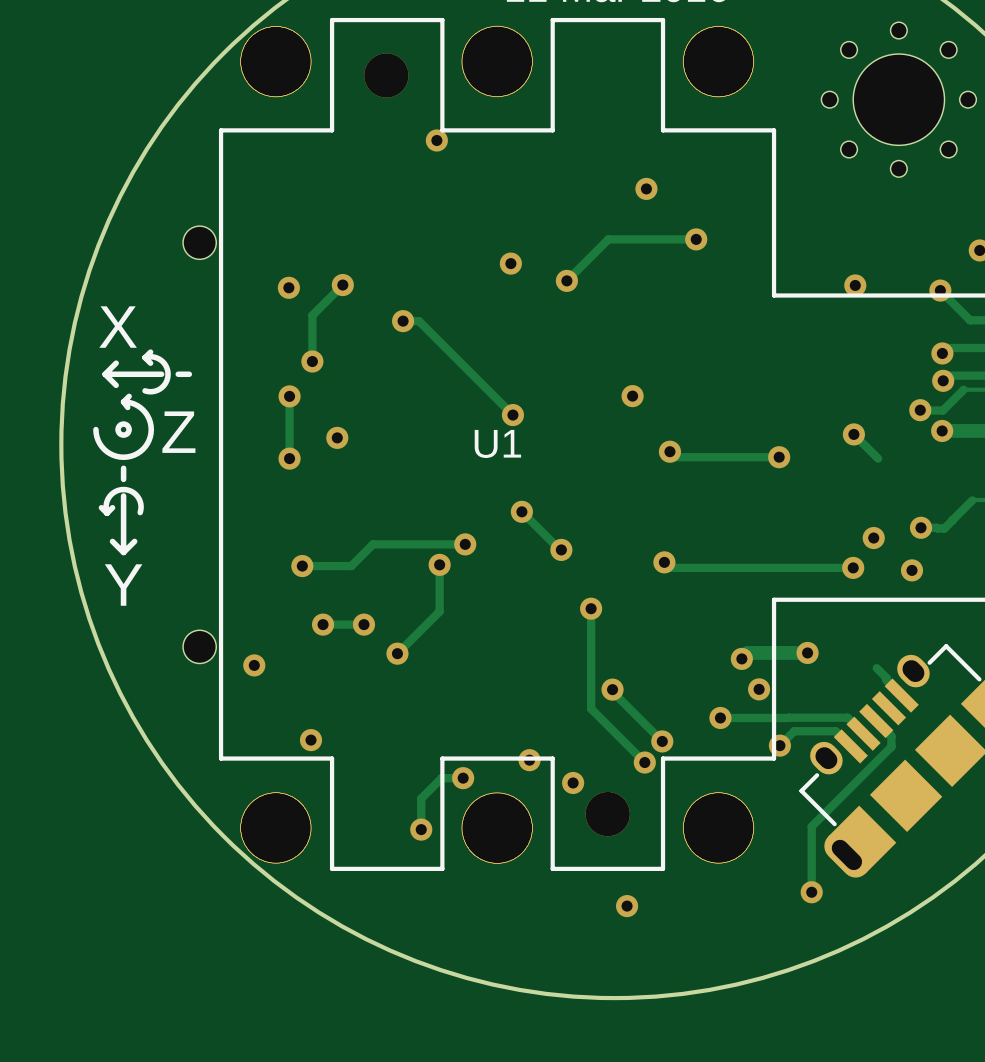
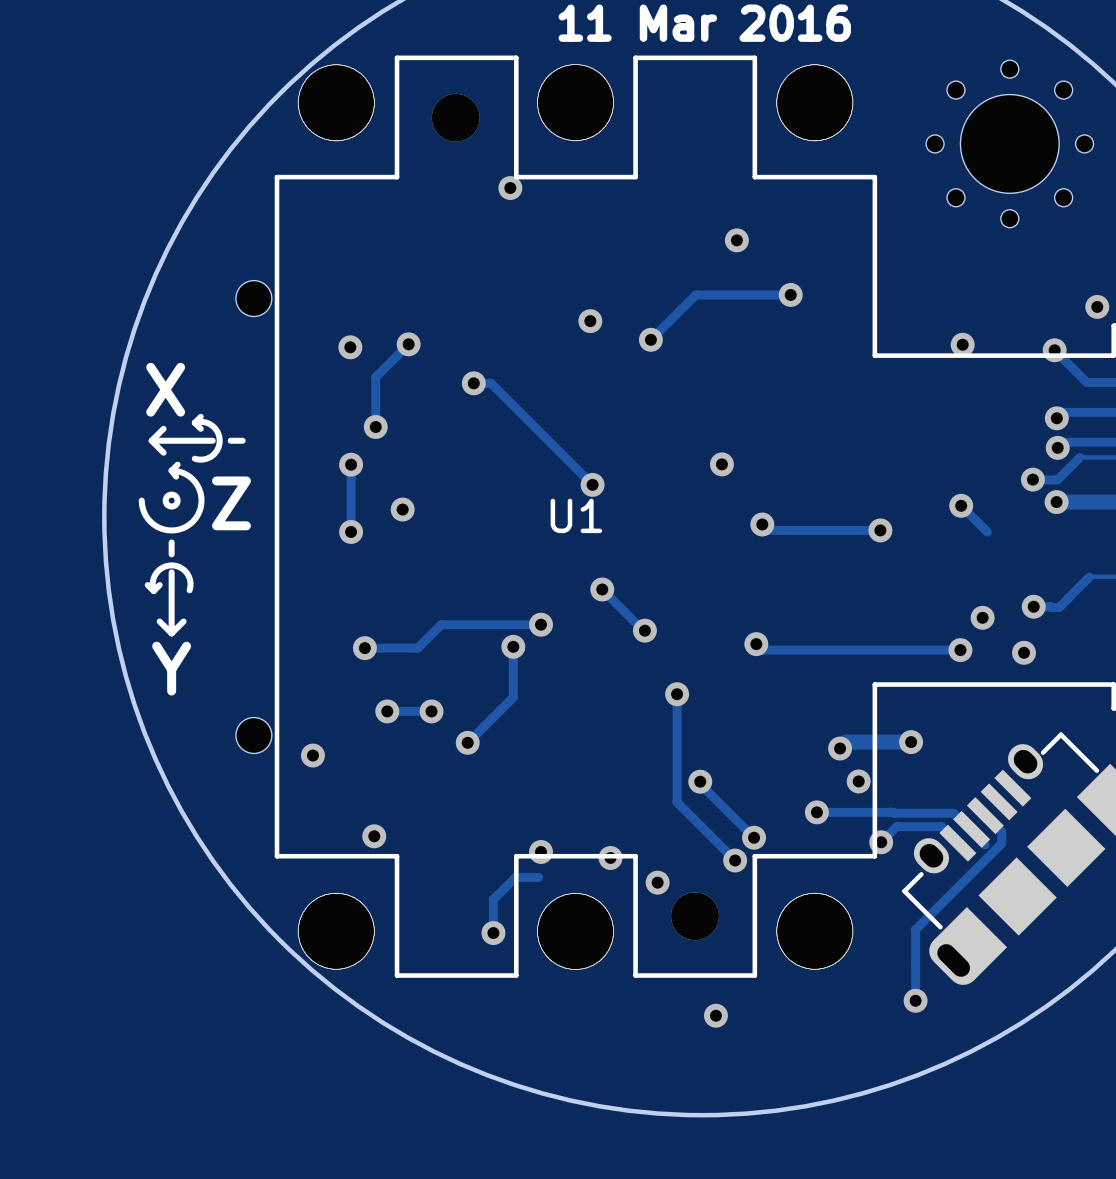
track: (876, 668) (901, 695) -> none
track: (788, 717) (847, 717) (863, 733) -> (890, 812) (953, 813) (985, 844)
via position: (463, 778) -> (541, 851)

